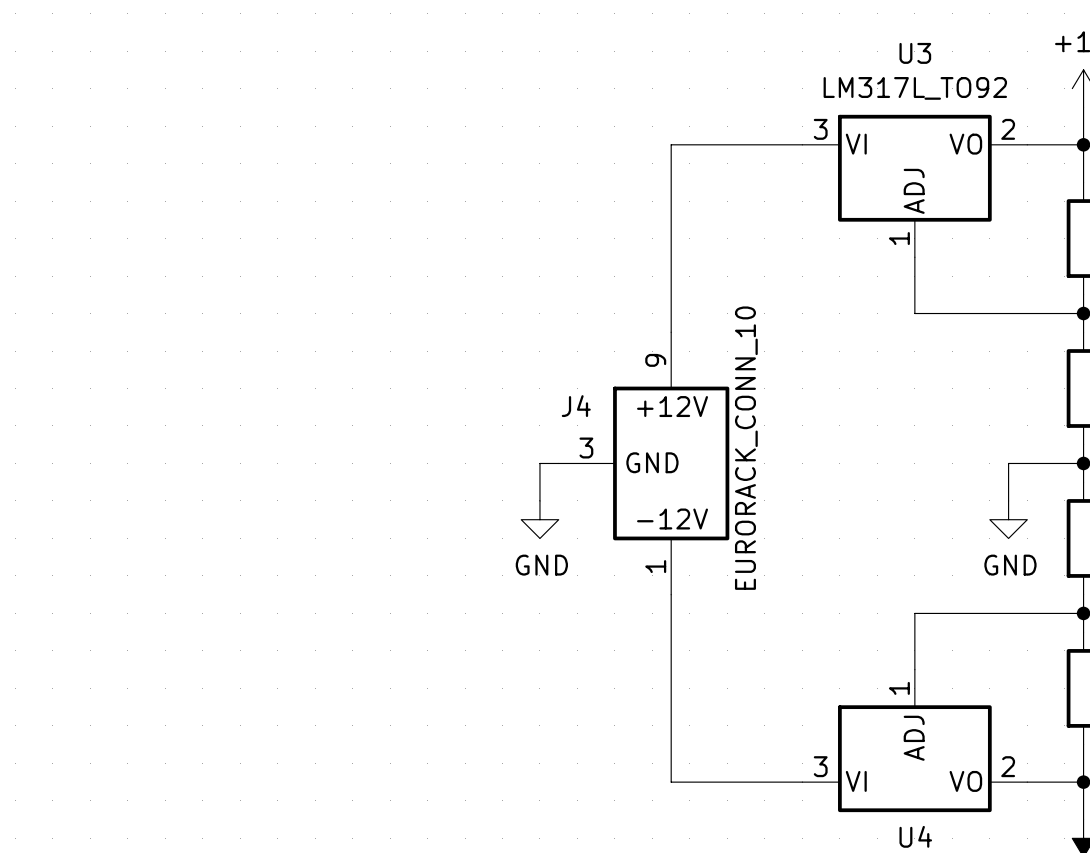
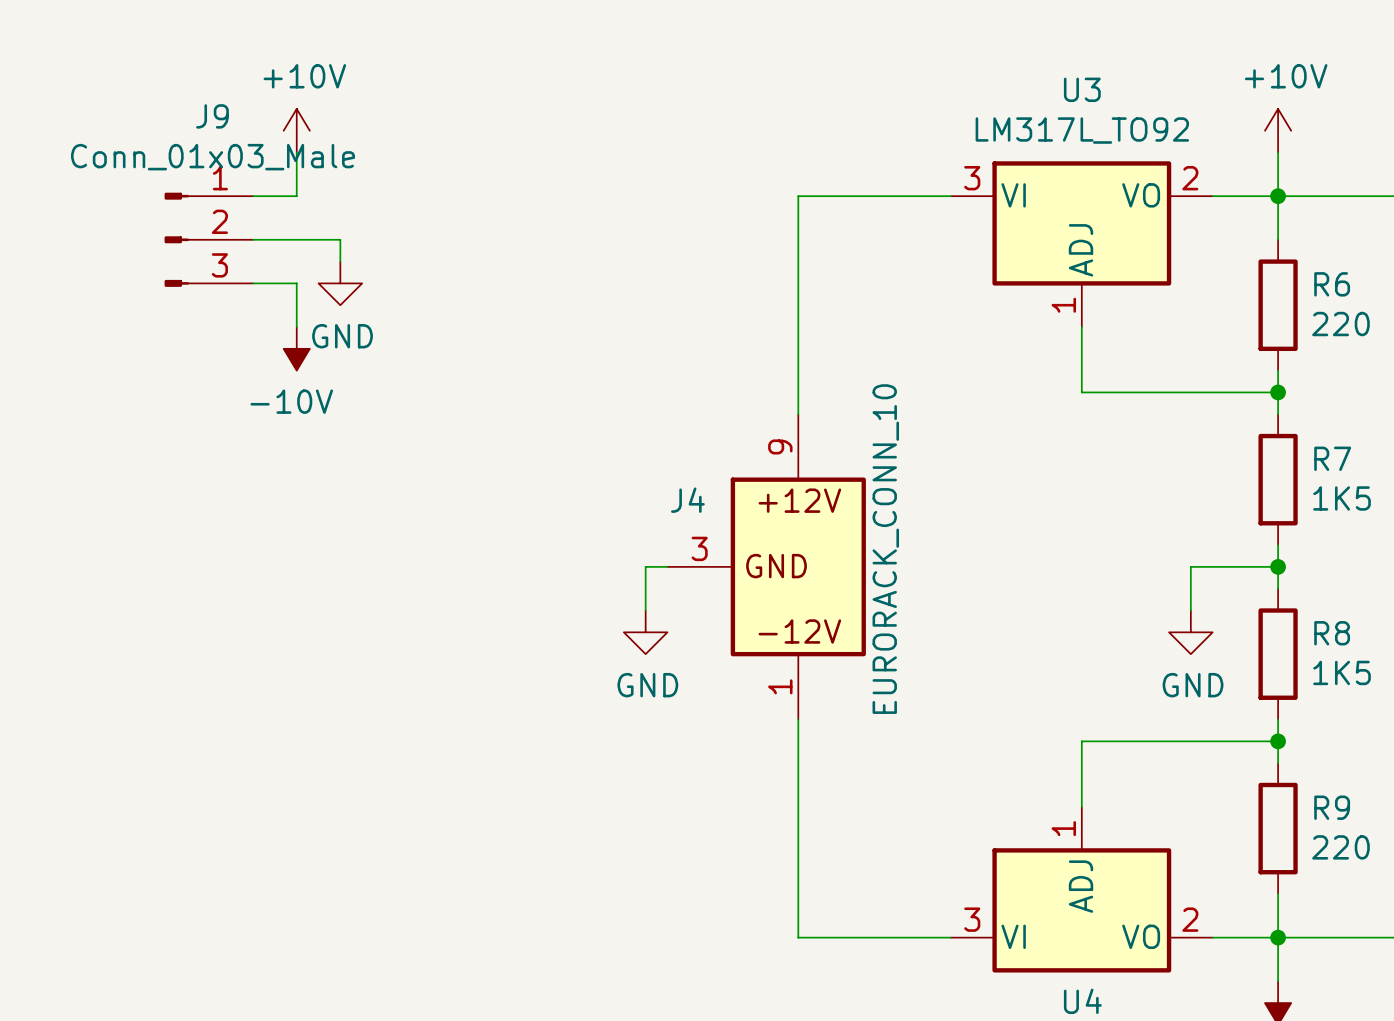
power symbol: none -> +10V (296, 130)
wire: none -> (296, 152) (296, 196) (253, 196)
J9: none -> Conn_01x03_Male (208, 239)
wire: none -> (253, 239) (340, 239) (340, 261)
wire: none -> (253, 283) (296, 283) (296, 327)
power symbol: none -> GND (340, 283)
power symbol: none -> -10V (296, 348)

